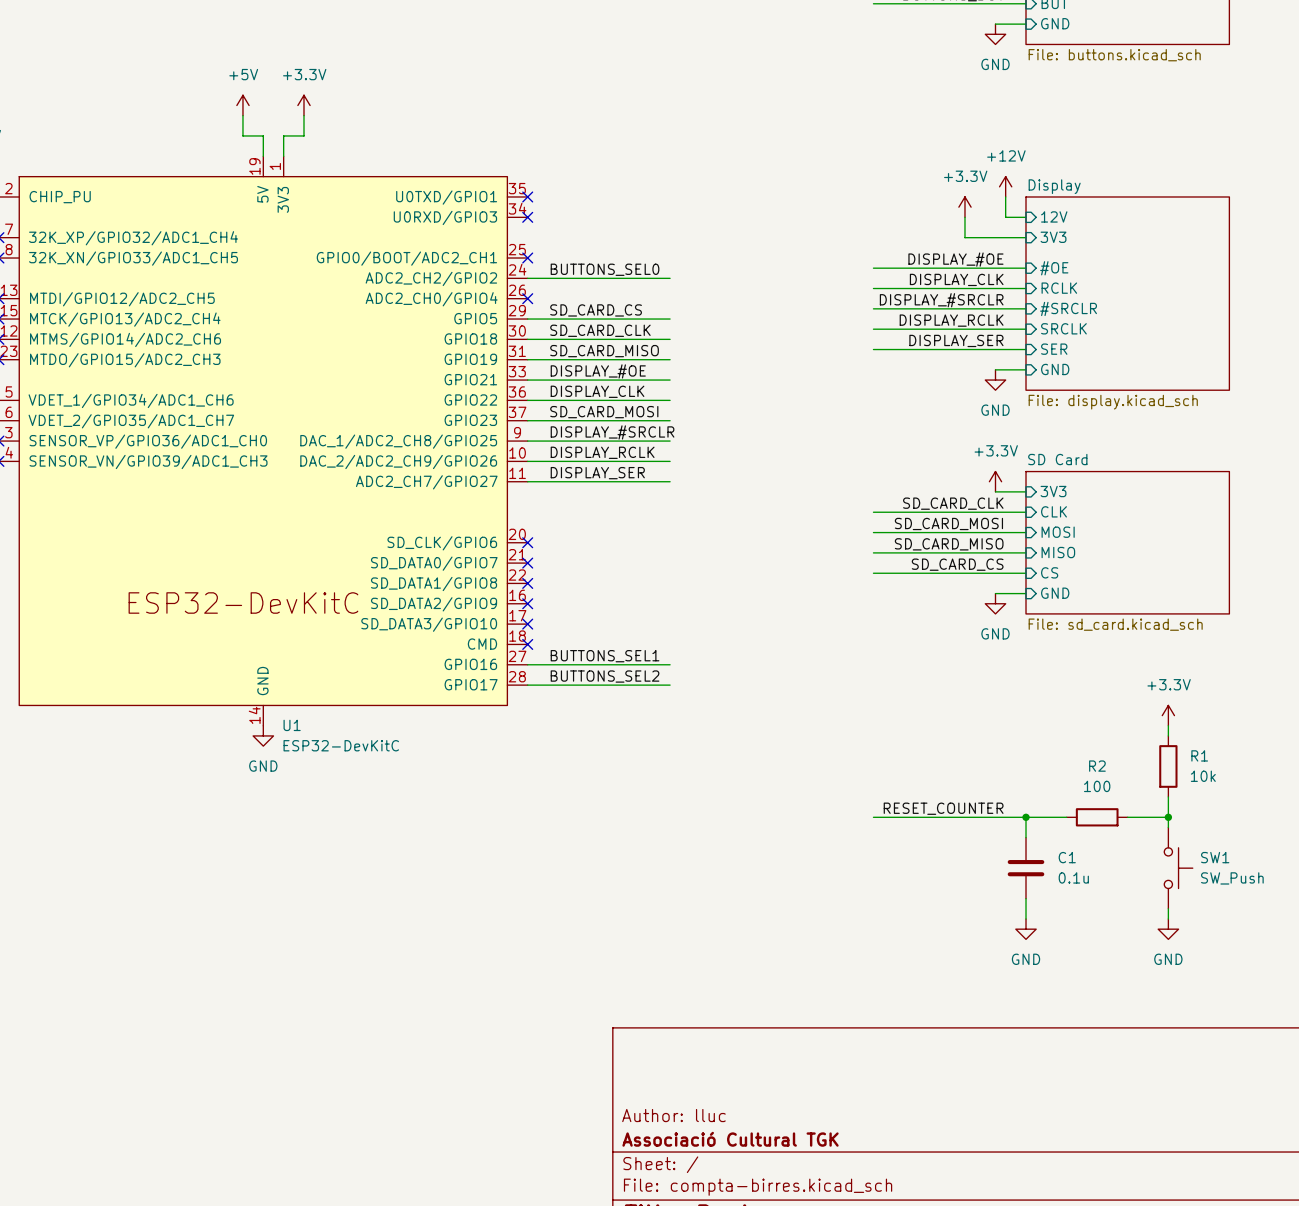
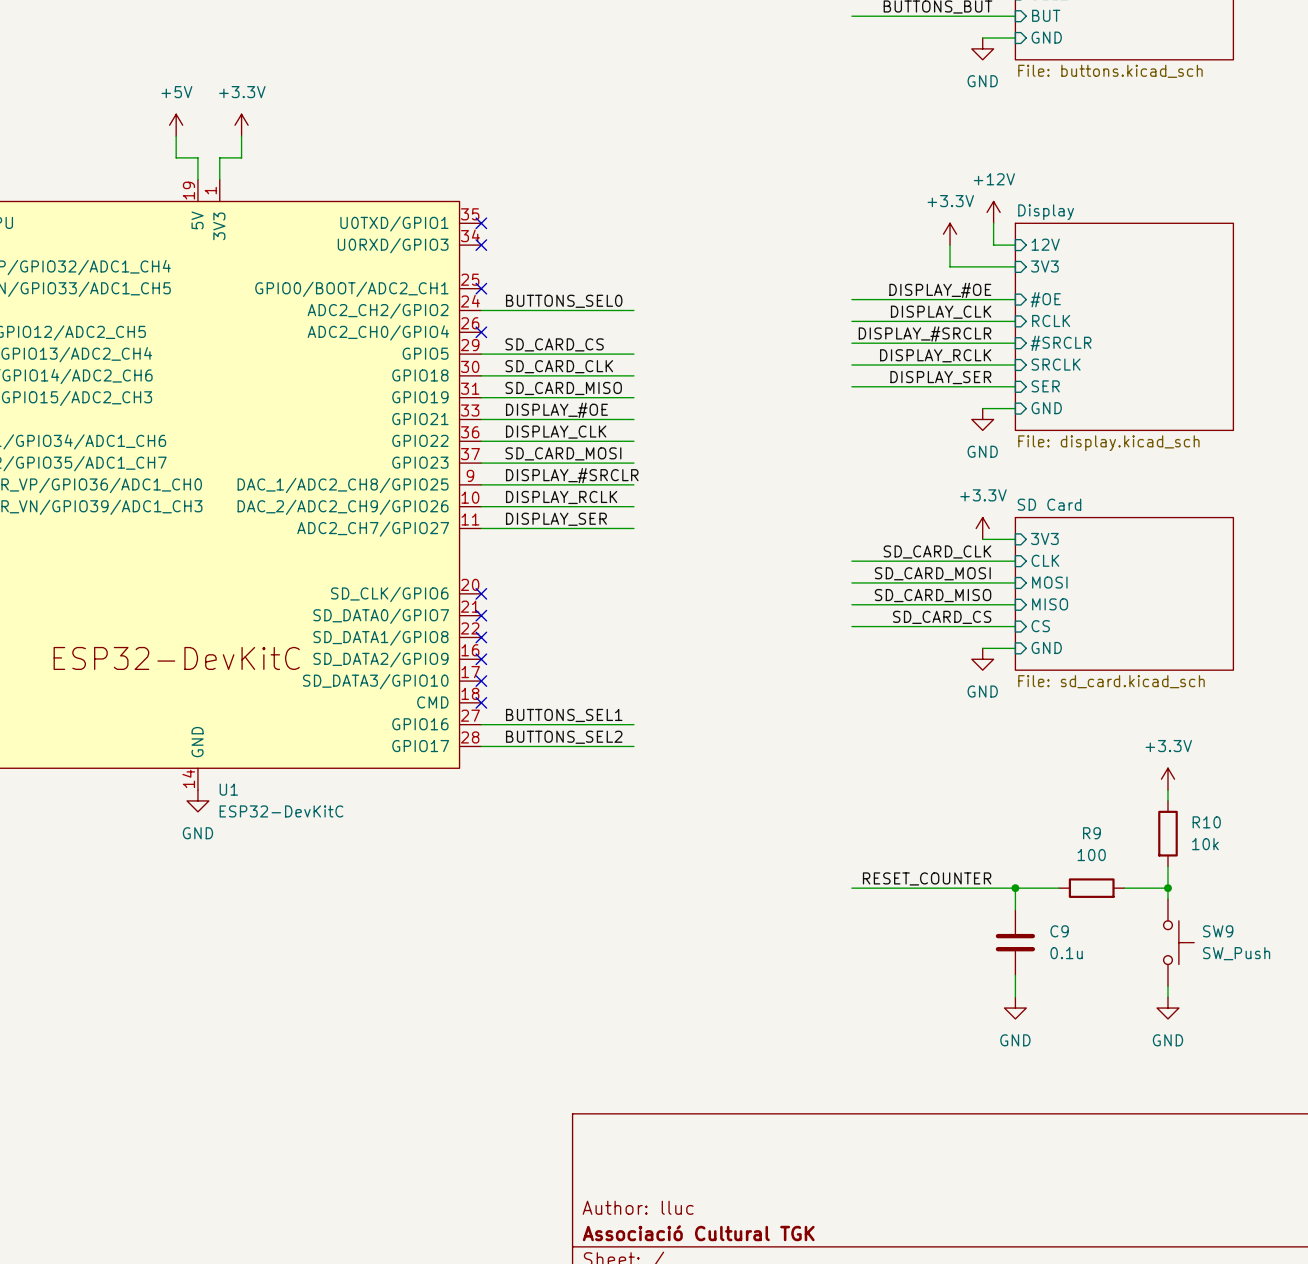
R1 name: R1 (1199, 755) -> R10 (1206, 822)
R2 name: R2 (1097, 766) -> R9 (1091, 833)
C1 name: C1 (1067, 857) -> C9 (1059, 931)
SW1 name: SW1 (1215, 857) -> SW9 (1218, 931)

